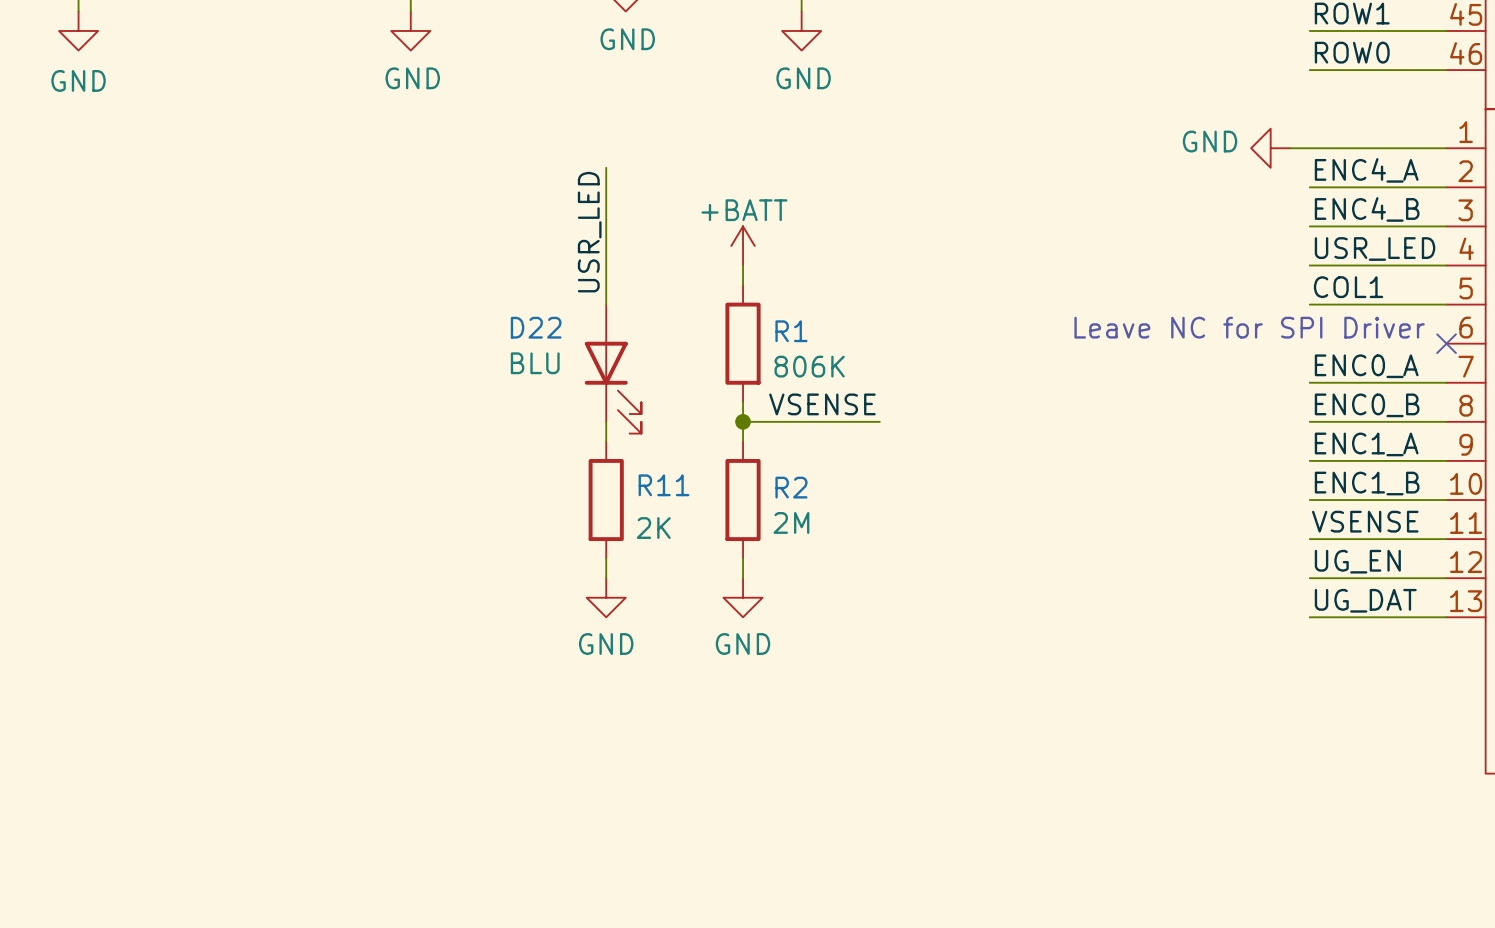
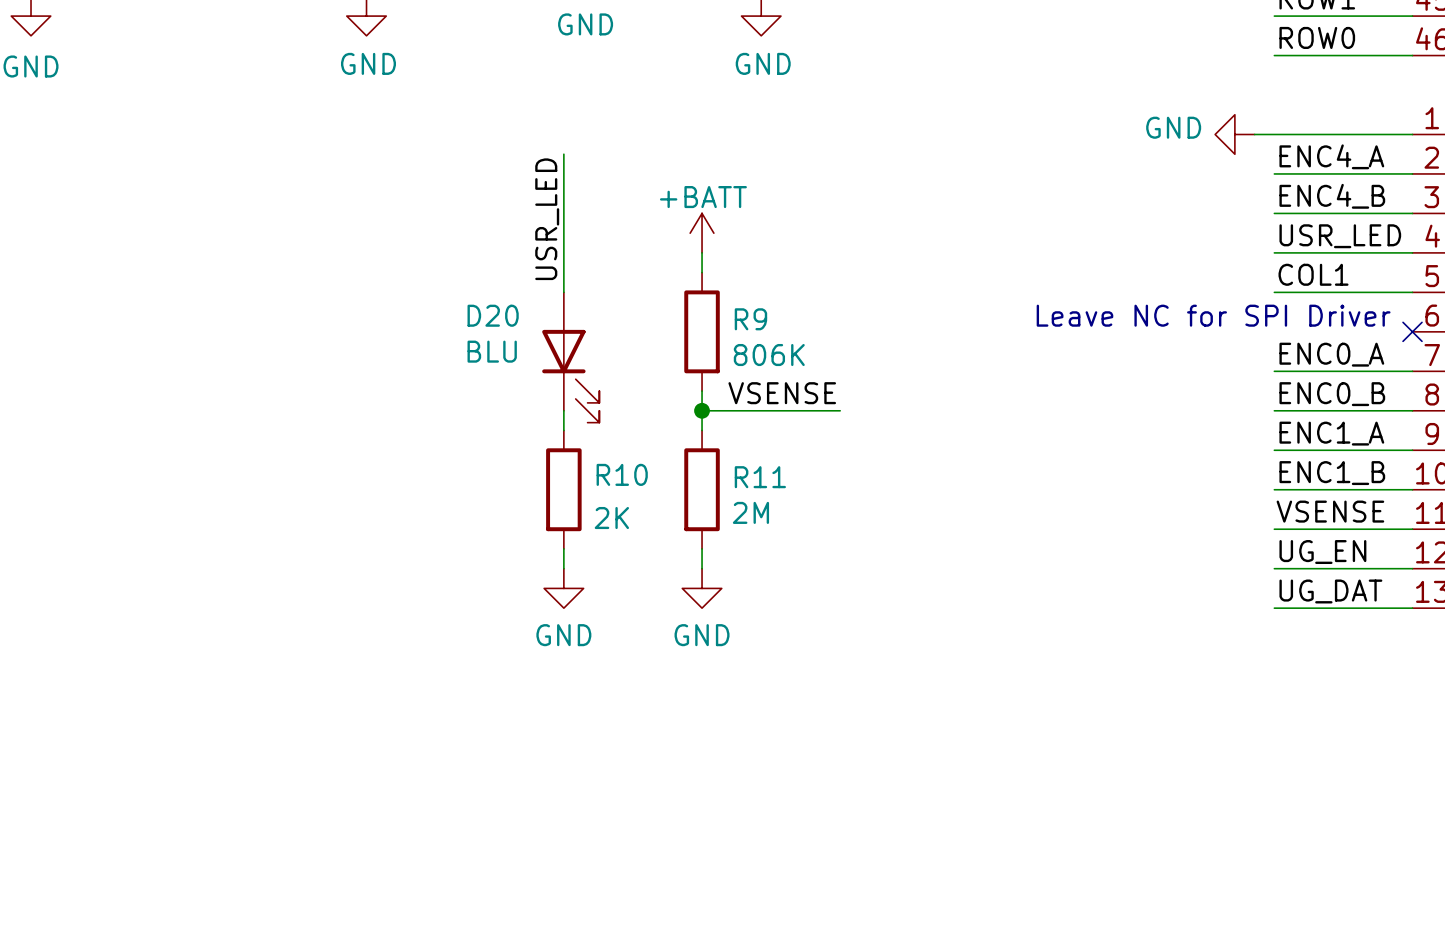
D22 name: D22 (536, 327) -> D20 (493, 315)
R1 name: R1 (791, 331) -> R9 (750, 319)
R11 name: R11 (663, 485) -> R10 (622, 474)
R2 name: R2 (791, 487) -> R11 (760, 477)

